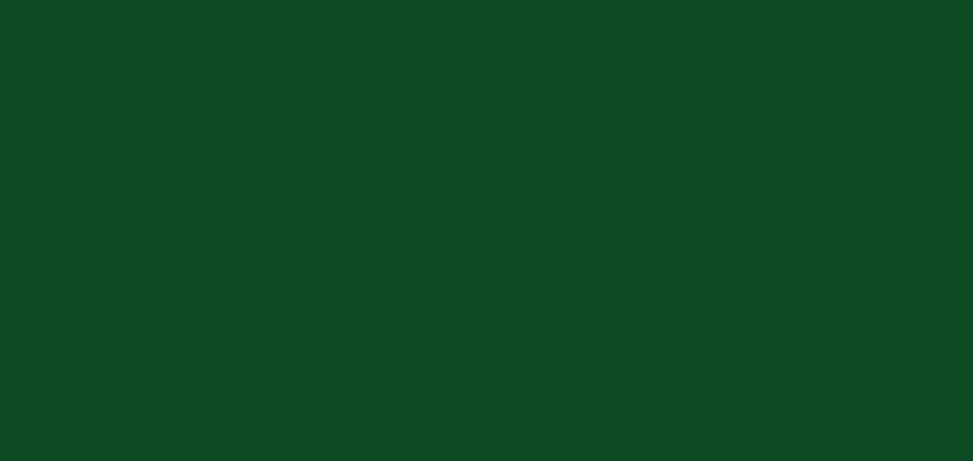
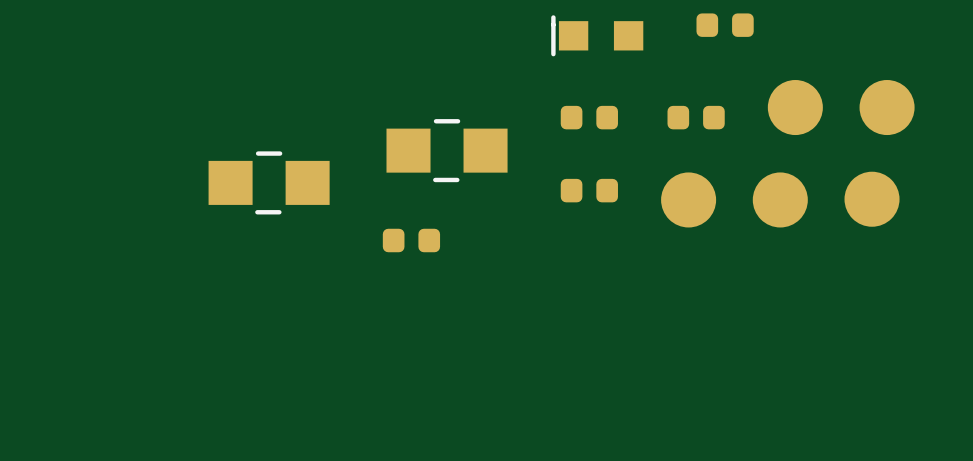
part: none -> (725, 25)
part: none -> (597, 35)
part: none -> (795, 107)
part: none -> (887, 107)
part: none -> (589, 117)
part: none -> (696, 117)
part: none -> (447, 150)
part: none -> (269, 182)
part: none -> (589, 190)
part: none -> (688, 199)
part: none -> (780, 199)
part: none -> (872, 199)
part: none -> (411, 240)

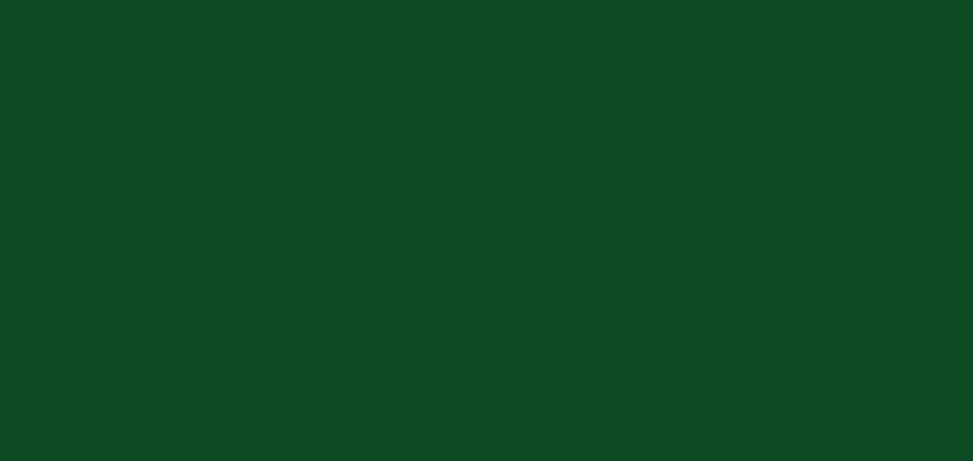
part: (725, 25) -> none
part: (597, 35) -> none
part: (795, 107) -> none
part: (887, 107) -> none
part: (589, 117) -> none
part: (696, 117) -> none
part: (447, 150) -> none
part: (269, 182) -> none
part: (589, 190) -> none
part: (688, 199) -> none
part: (780, 199) -> none
part: (872, 199) -> none
part: (411, 240) -> none

